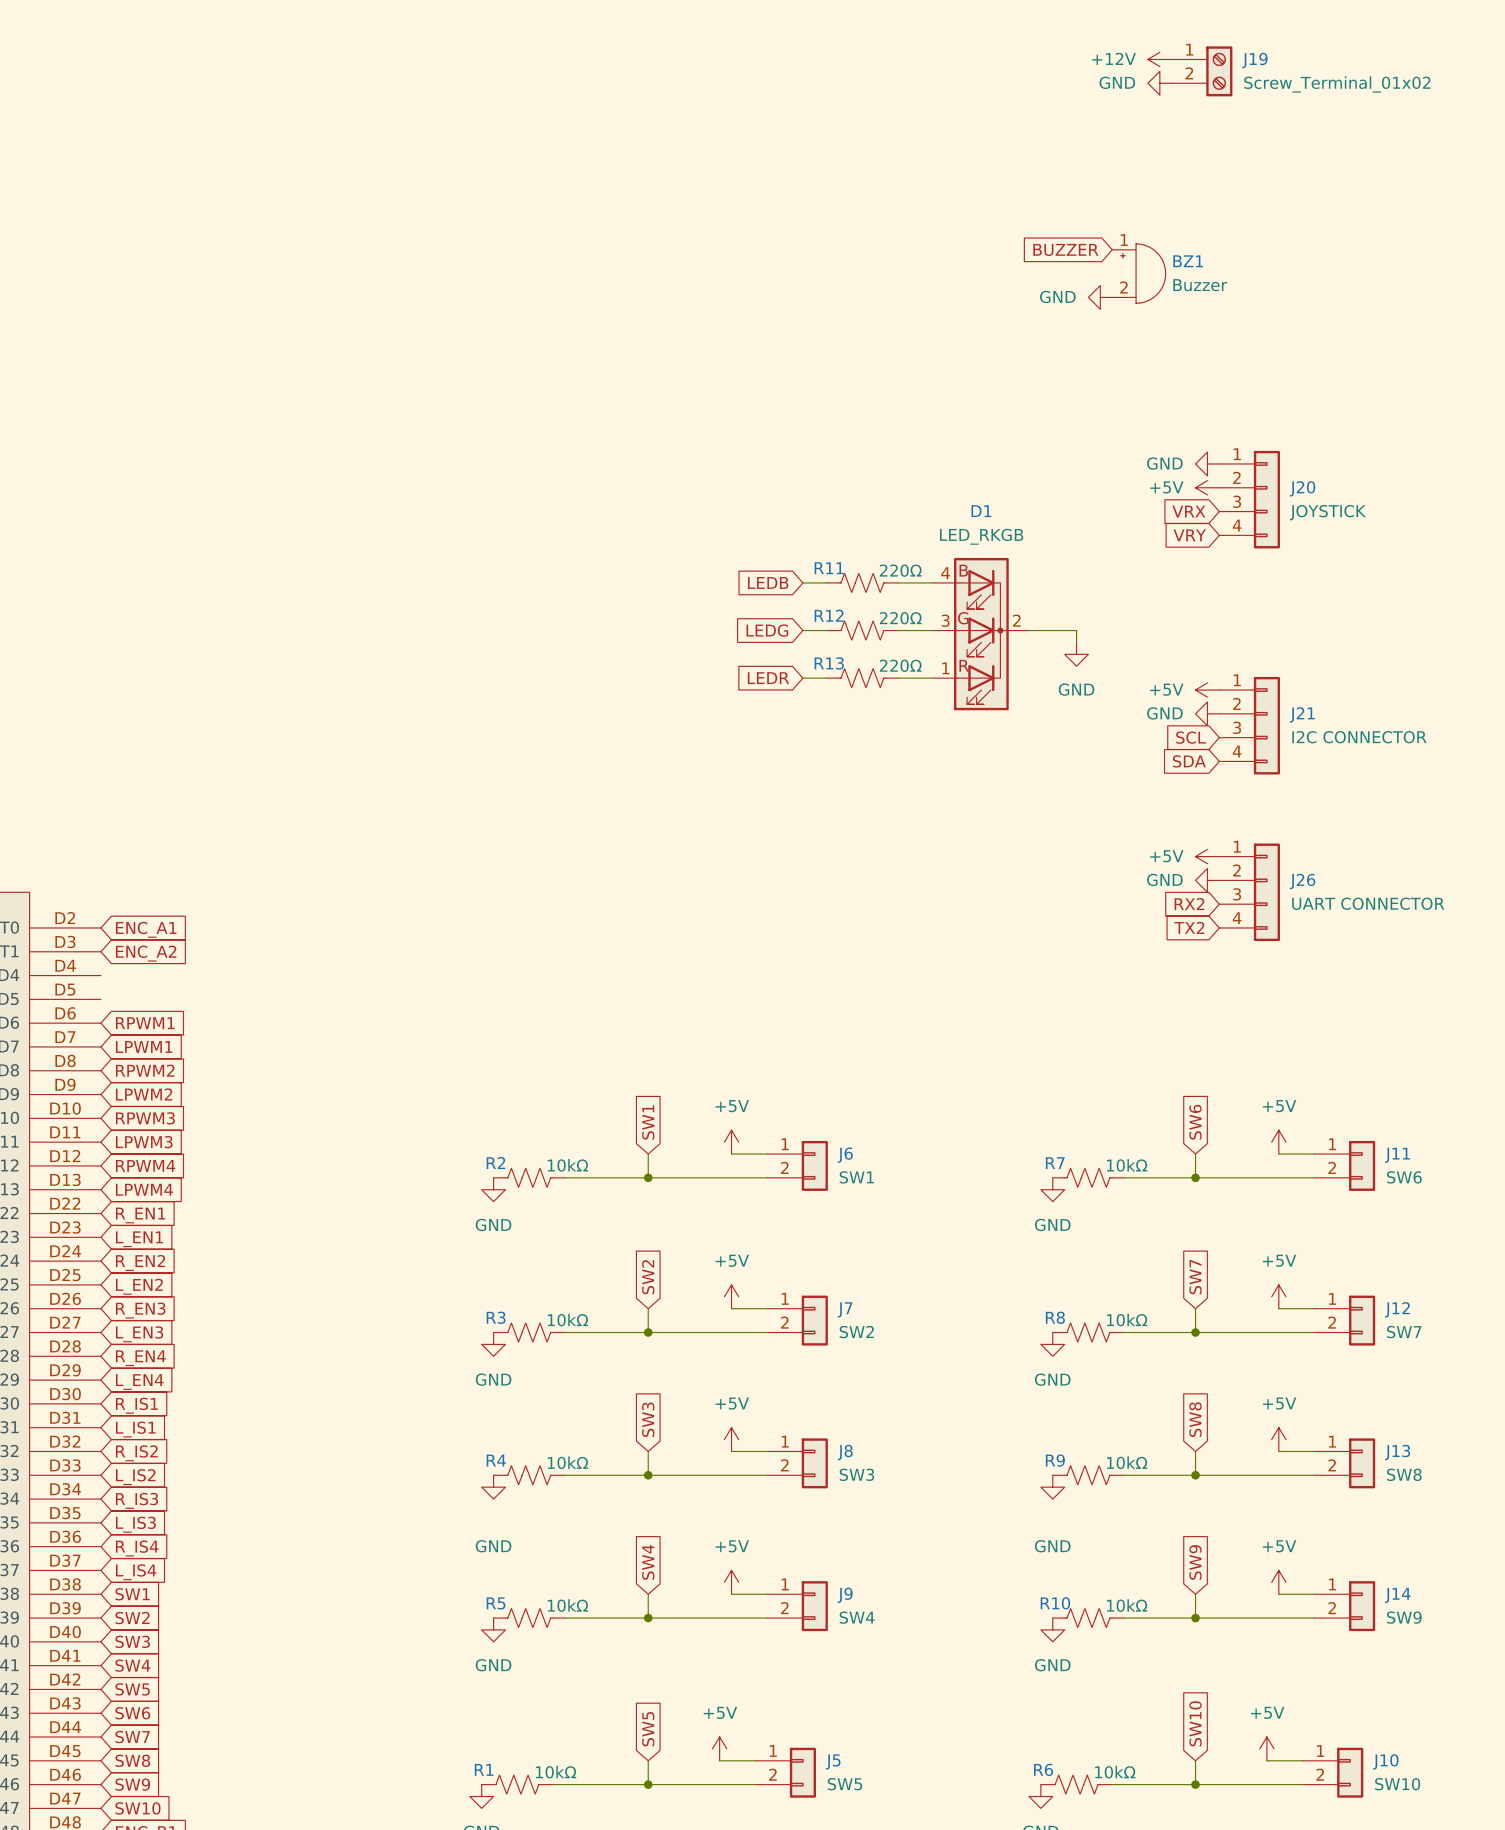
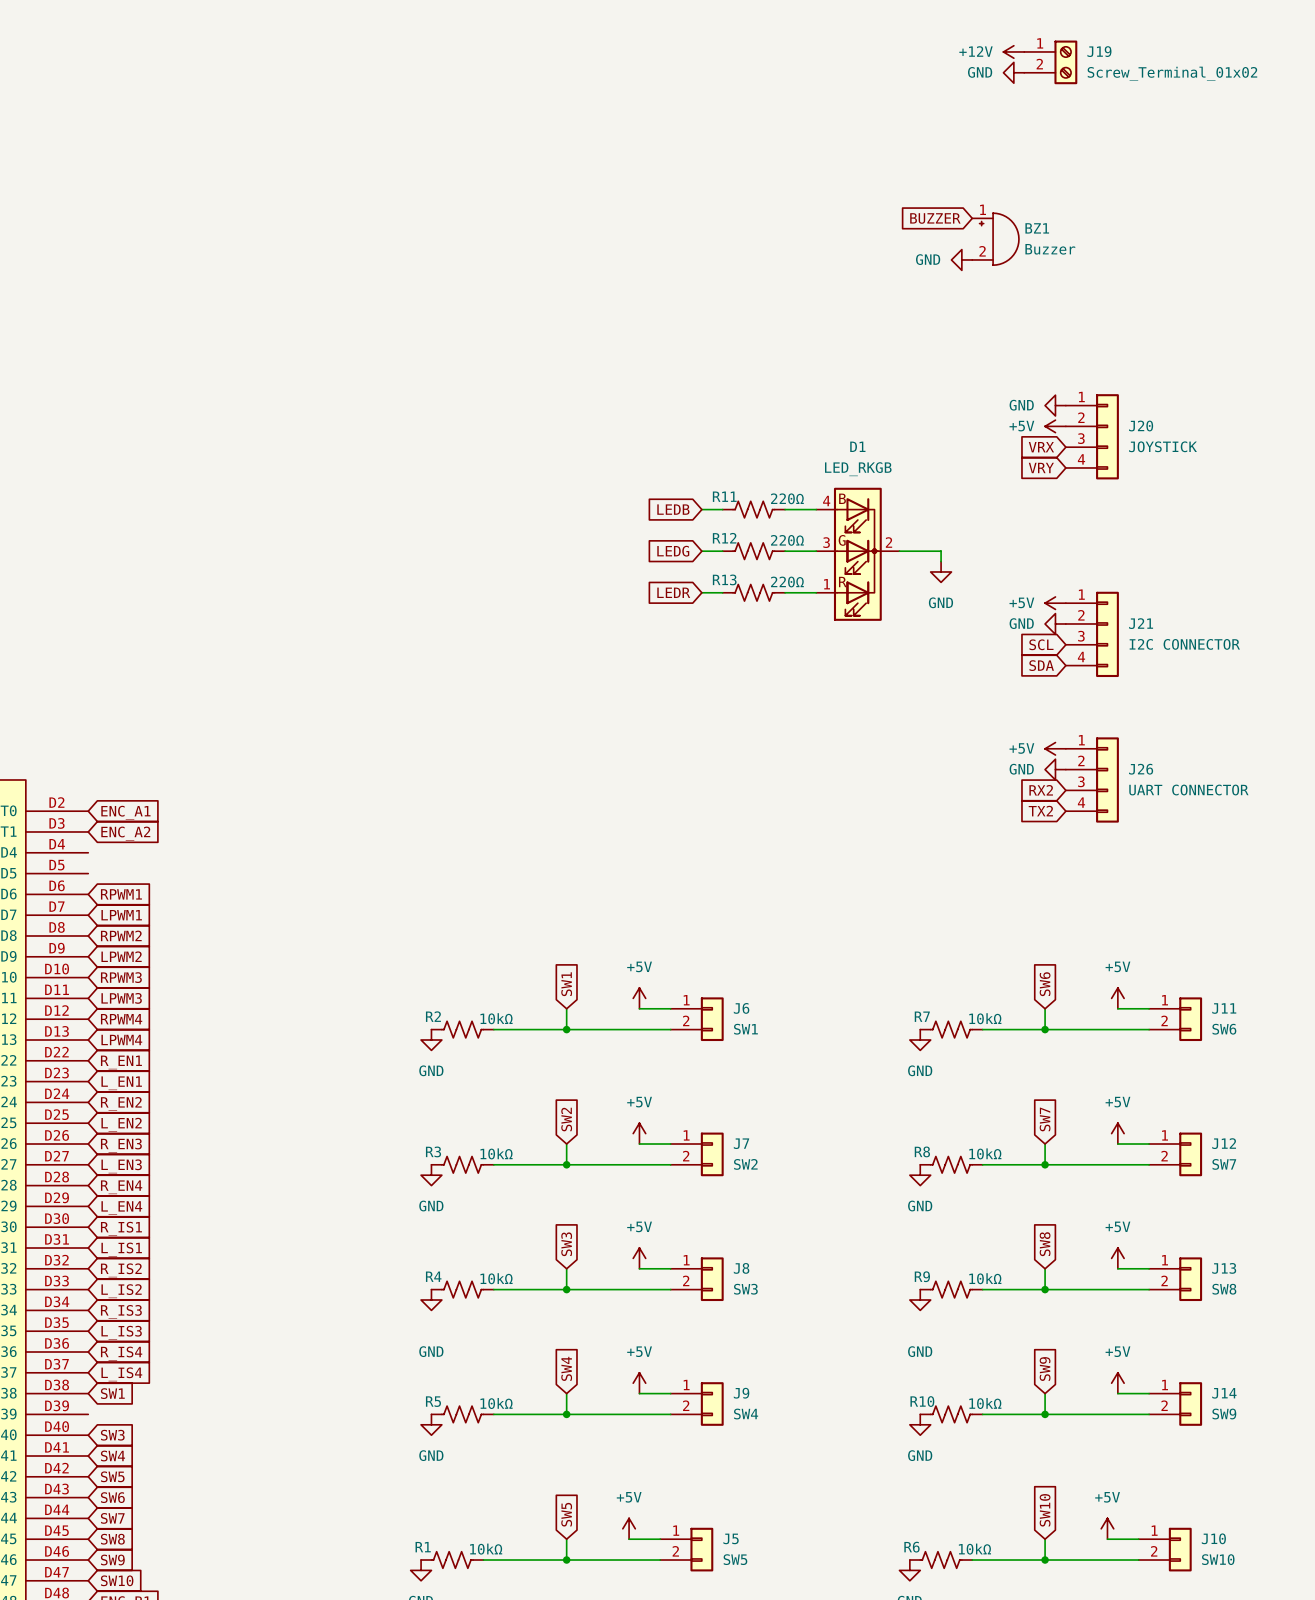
global label: SW2 (132, 1618) -> none

